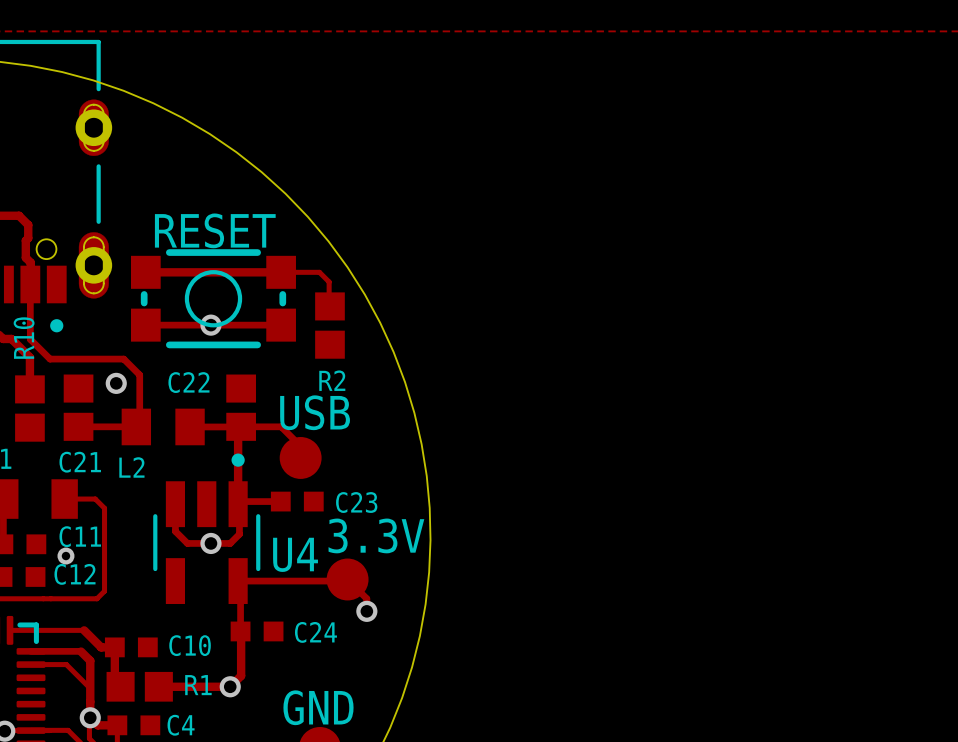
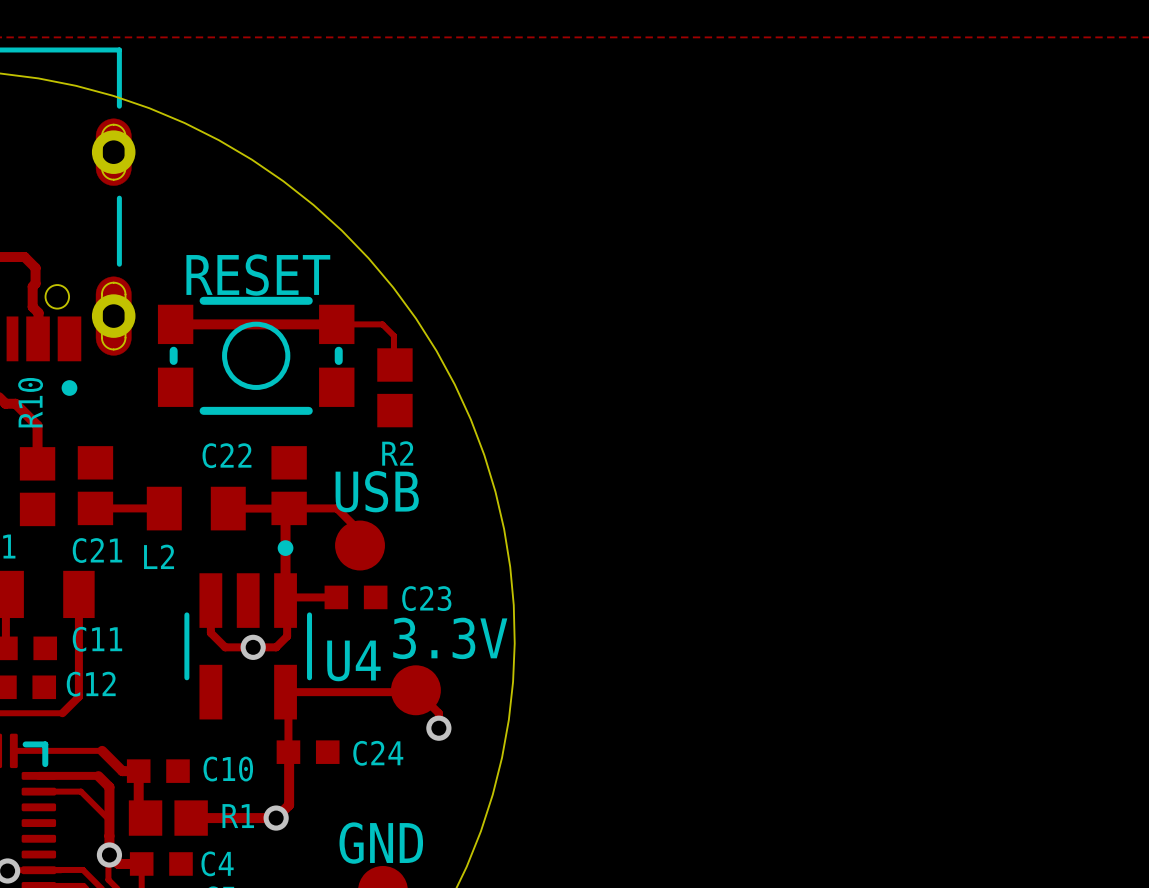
track: (30, 284) (30, 339) (50, 359) (123, 359) (139, 375) (139, 423) (136, 426) -> none
track: (145, 325) (281, 325) -> none
via: (210, 325) -> none
via: (116, 383) -> none
track: (64, 499) (95, 499) (104, 508) (104, 591) (96, 598) (50, 598) -> (78, 594) (78, 696) (62, 713)
via: (65, 556) -> none

